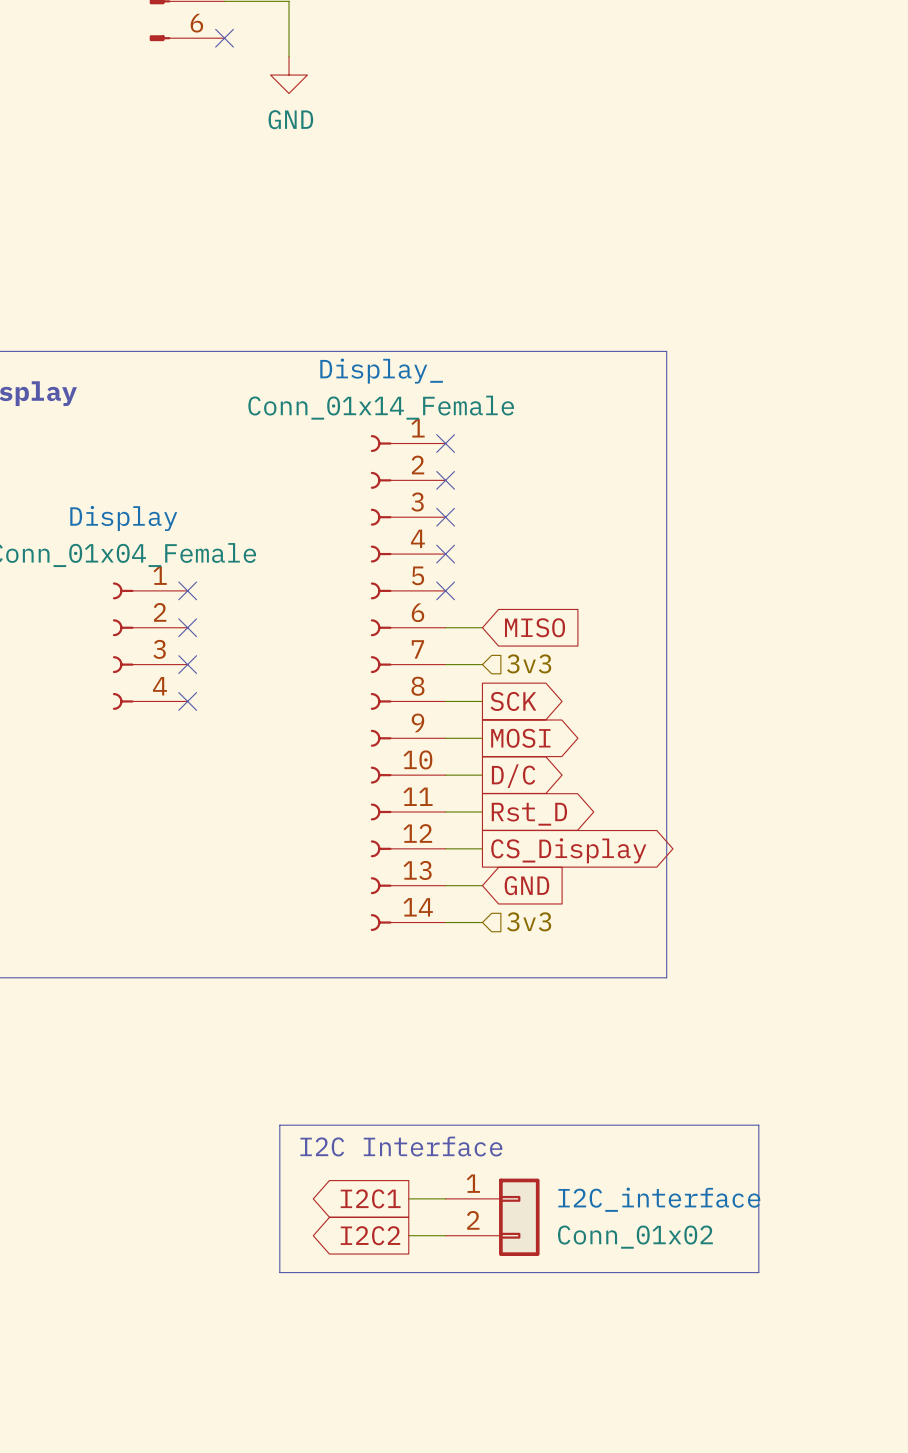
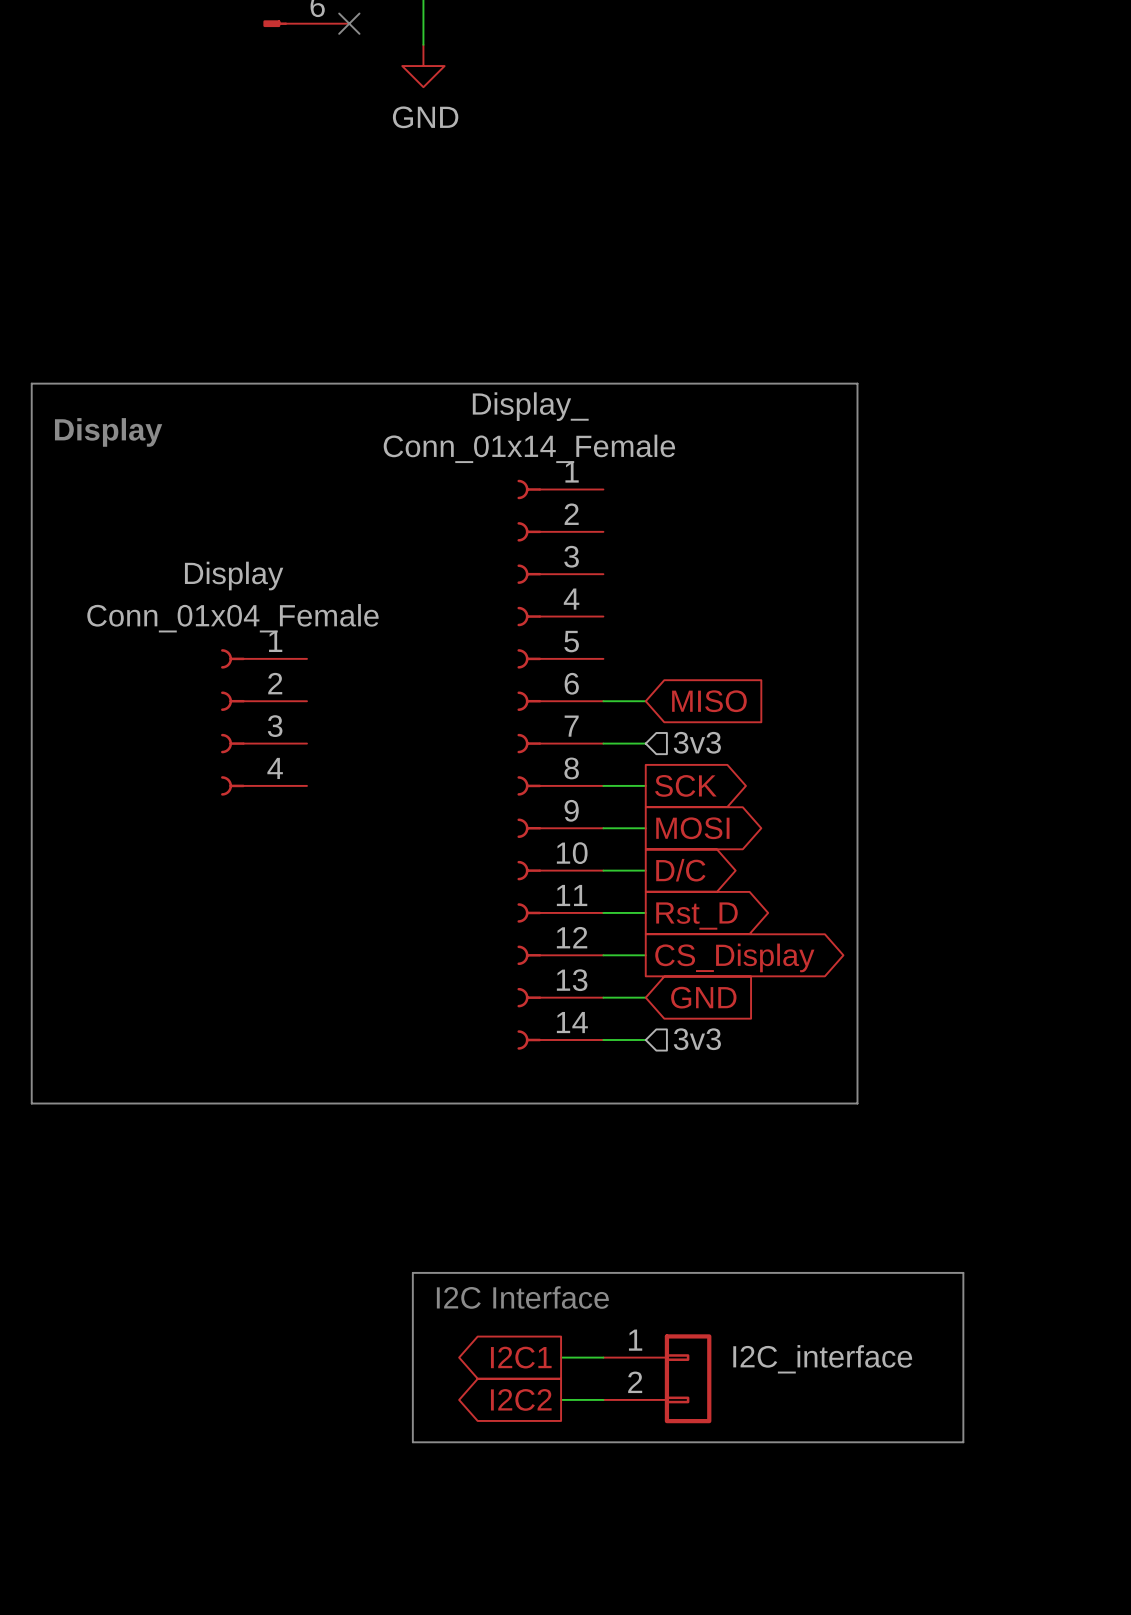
no-connect mark: (445, 443) -> none
no-connect mark: (445, 480) -> none
no-connect mark: (445, 517) -> none
no-connect mark: (445, 554) -> none
no-connect mark: (187, 590) -> none
no-connect mark: (445, 590) -> none
no-connect mark: (187, 627) -> none
no-connect mark: (187, 664) -> none
no-connect mark: (187, 701) -> none
I2C_interface value: Conn_01x02 (635, 1237) -> none

